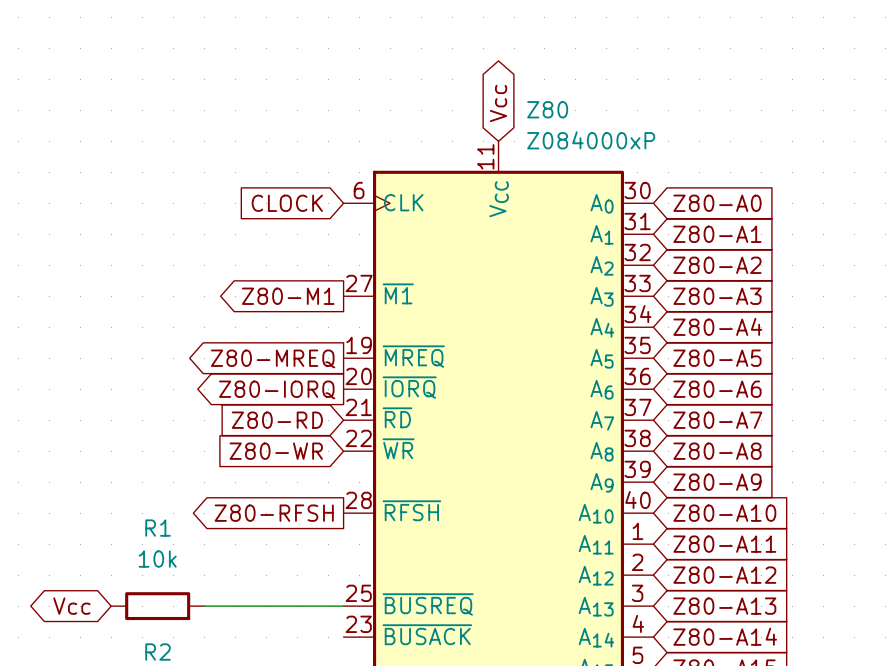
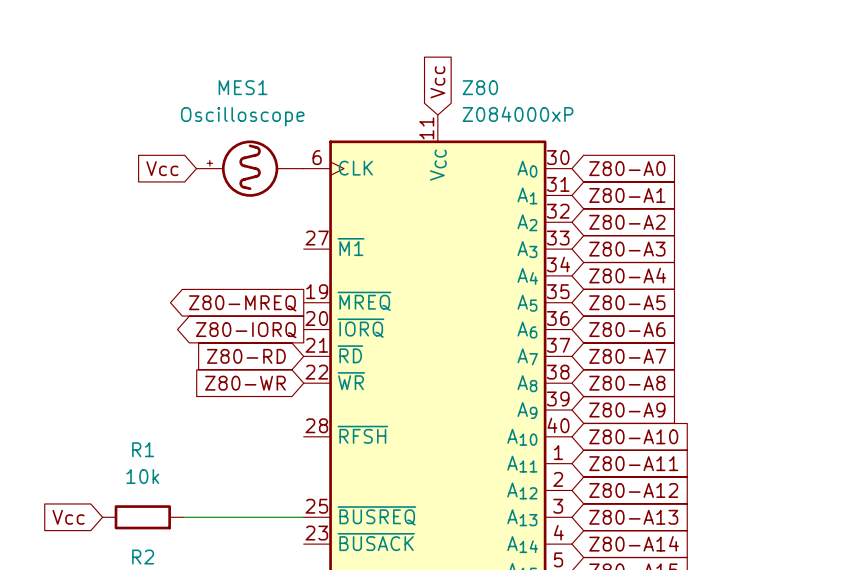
global label shape: bidirectional (498, 103) -> input (437, 82)
global label: none -> Vcc (162, 168)
MES1: none -> Oscilloscope (250, 168)
global label: CLOCK (287, 203) -> none
global label: Z80-M1 (288, 296) -> none
global label: Z80-RFSH (274, 513) -> none
global label shape: bidirectional (71, 606) -> input (68, 517)

